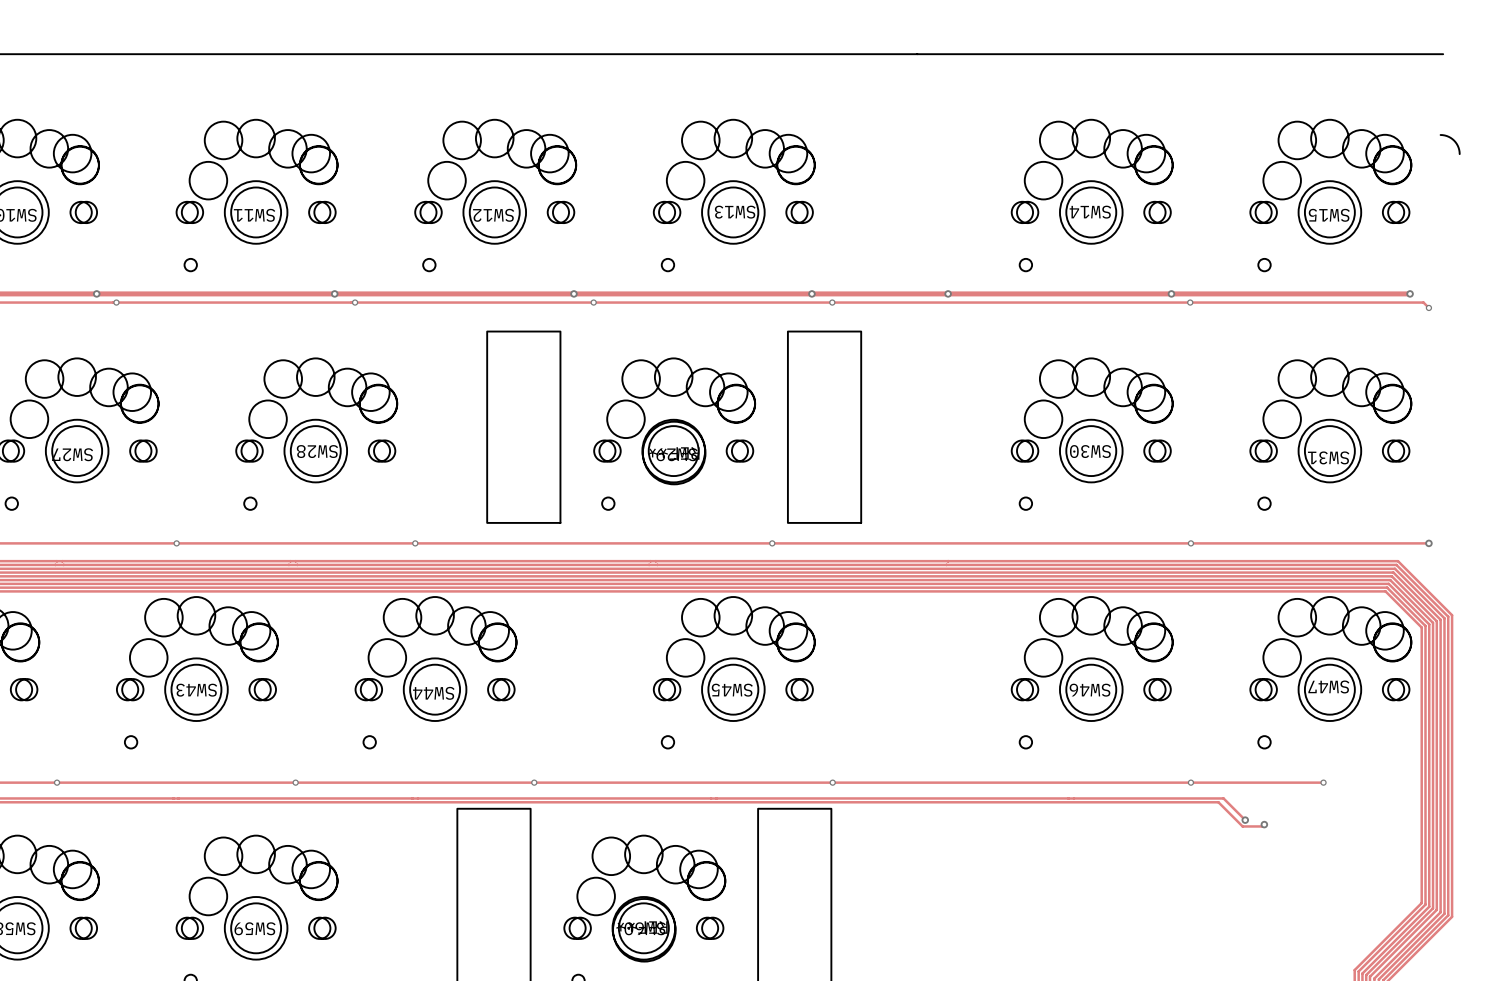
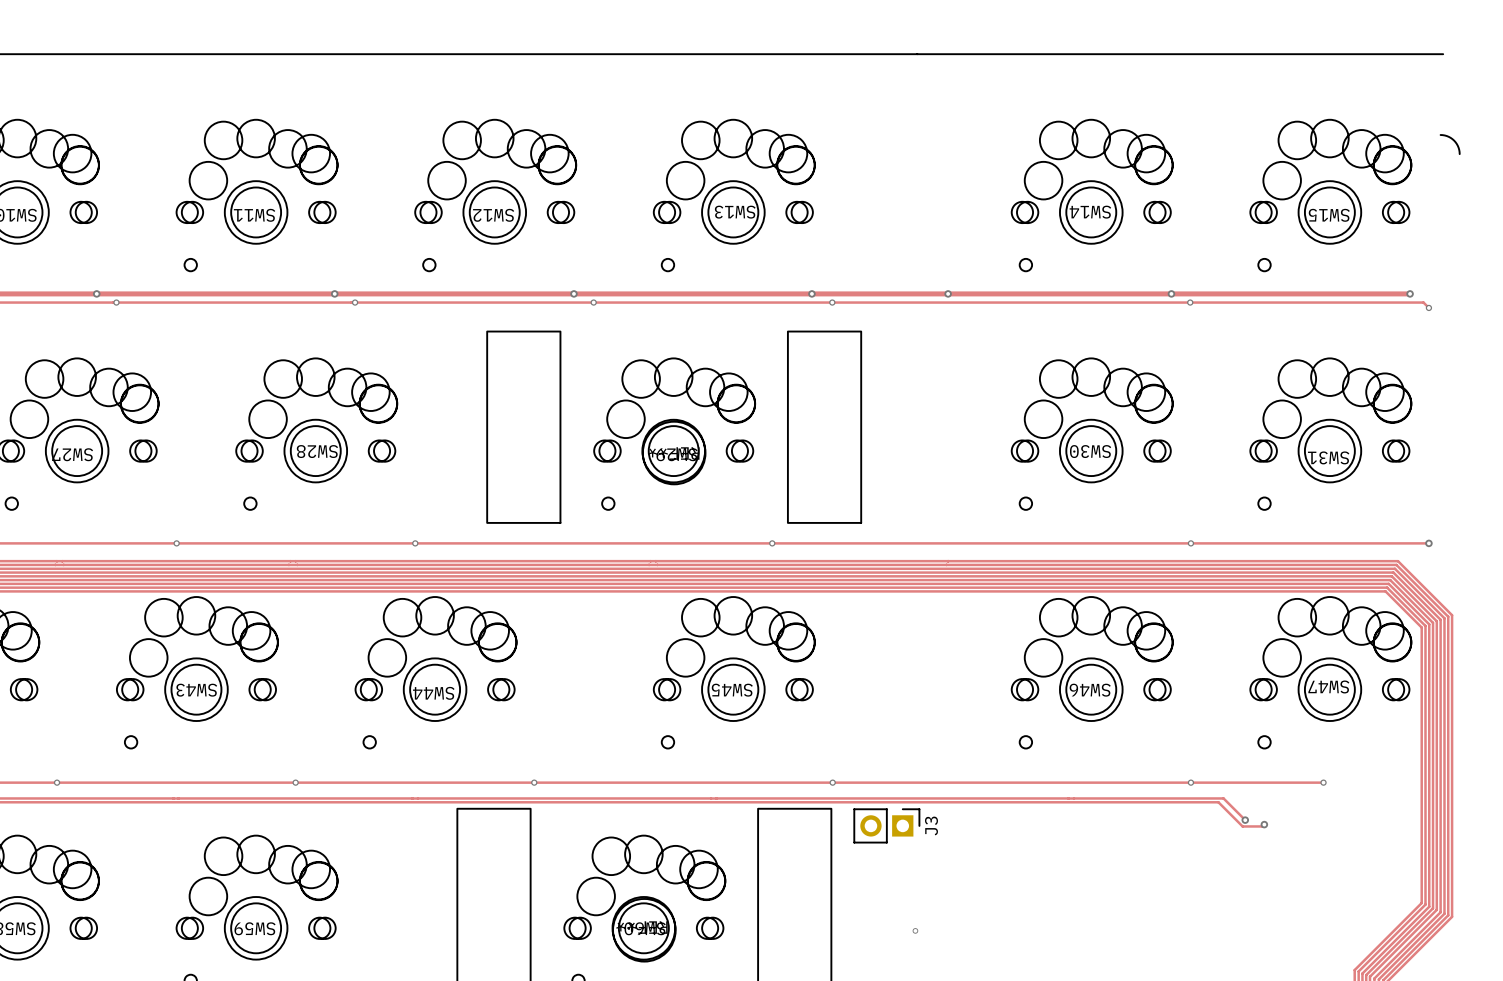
J3: none -> (886, 825)
via: none -> (915, 930)

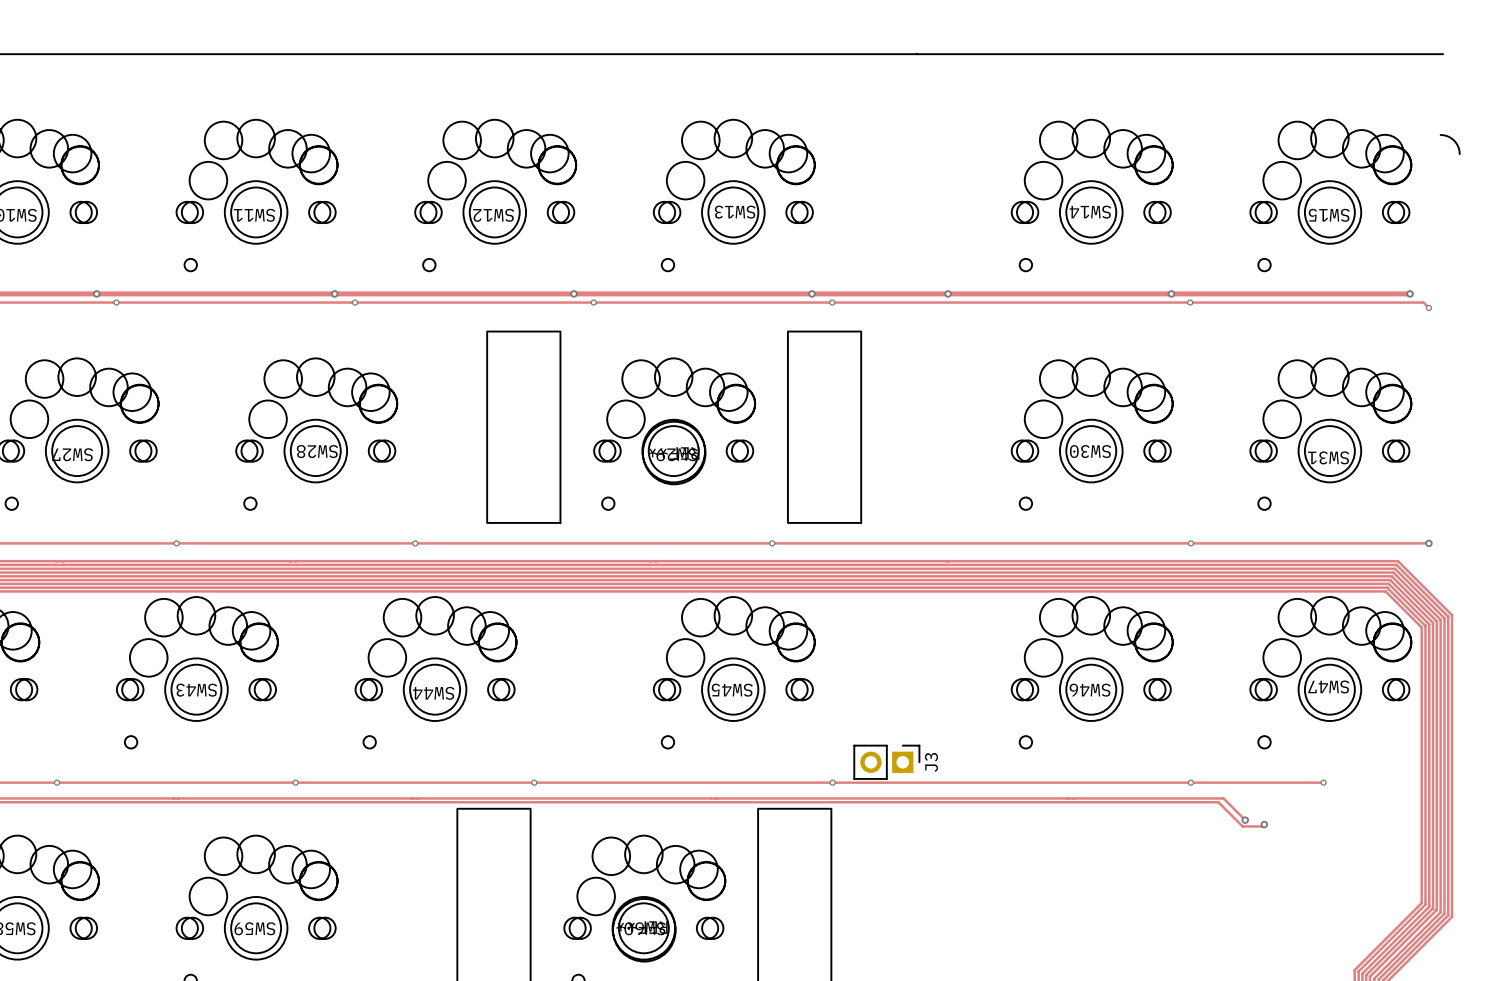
J3 position: (886, 825) -> (886, 762)
via: (915, 930) -> none

